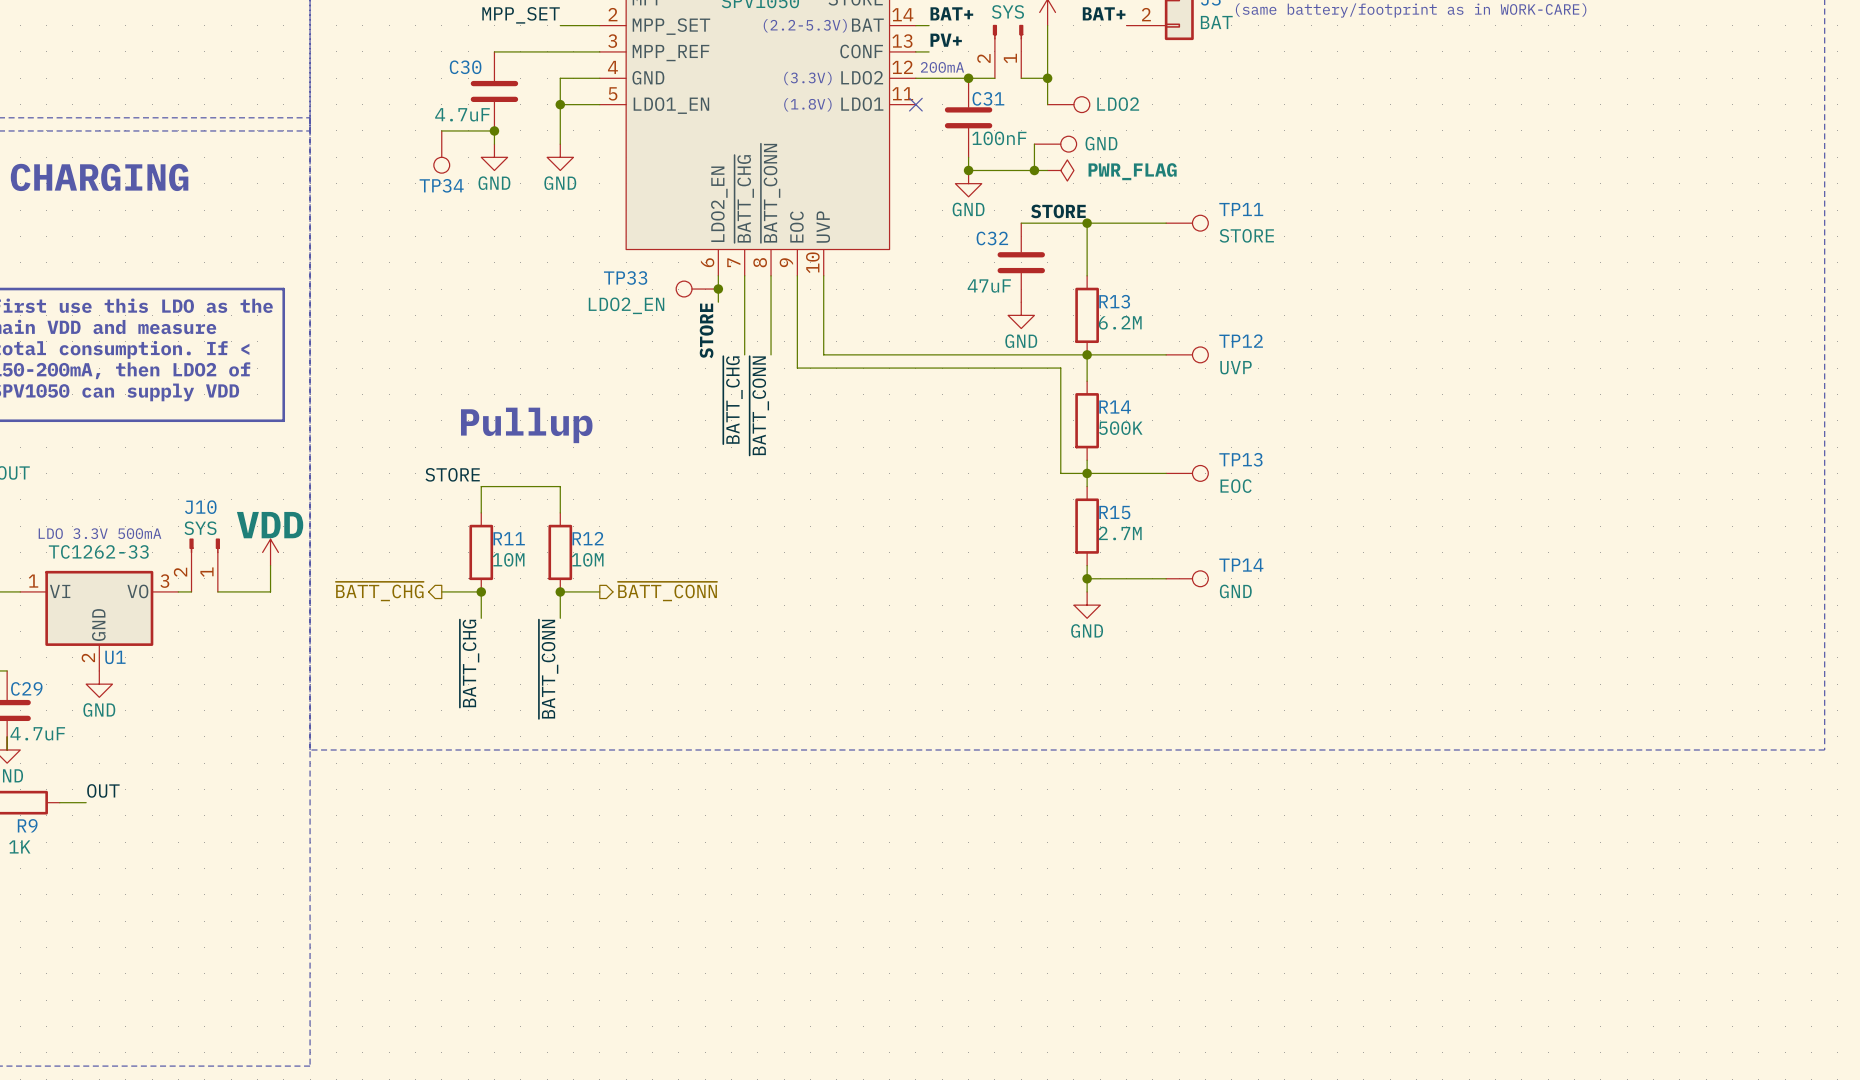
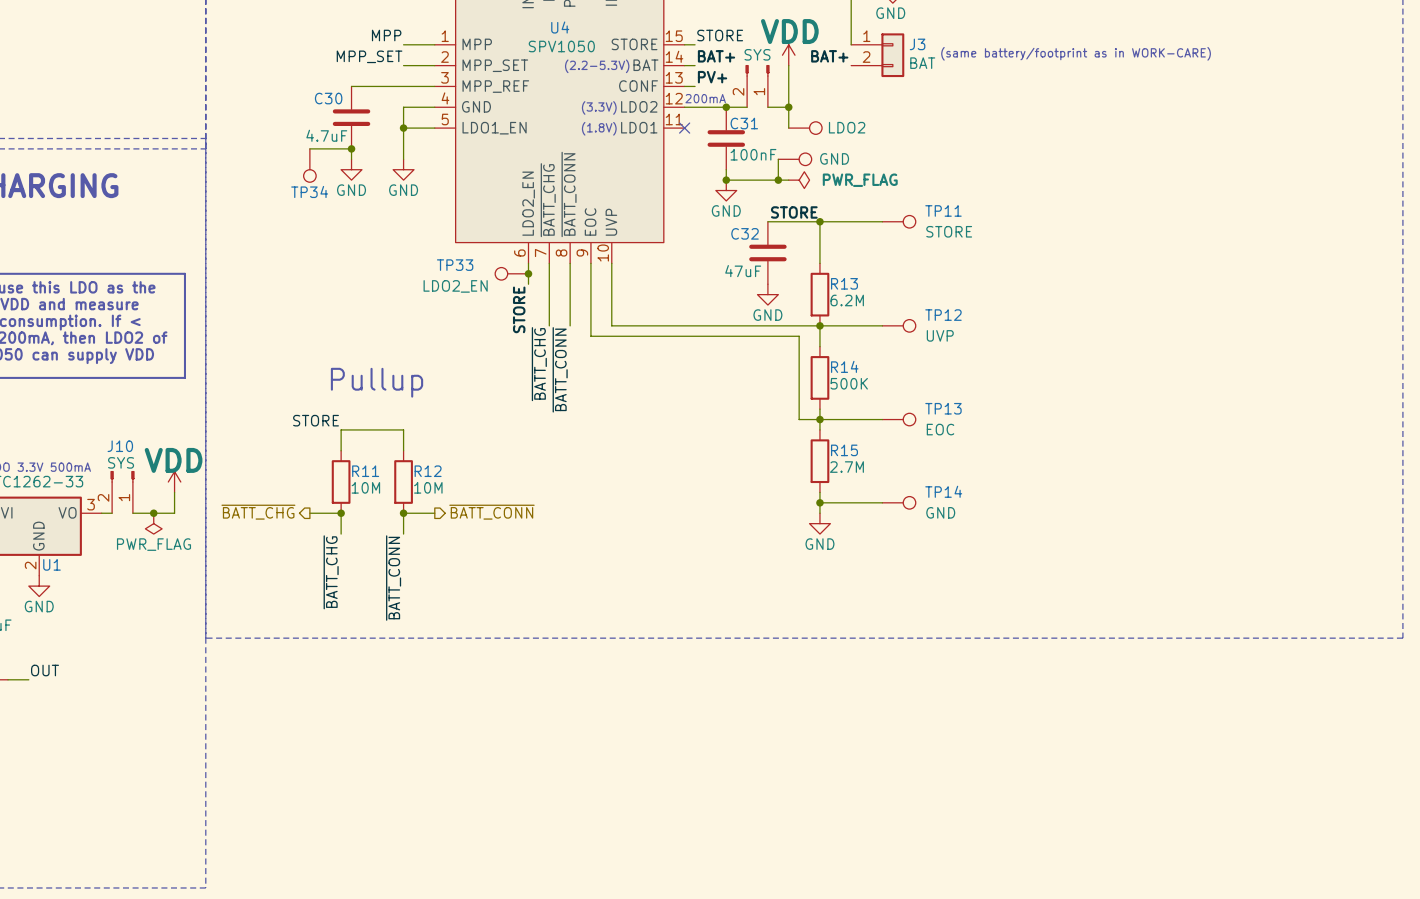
junction: none -> (153, 513)
power symbol: none -> PWR_FLAG (153, 523)

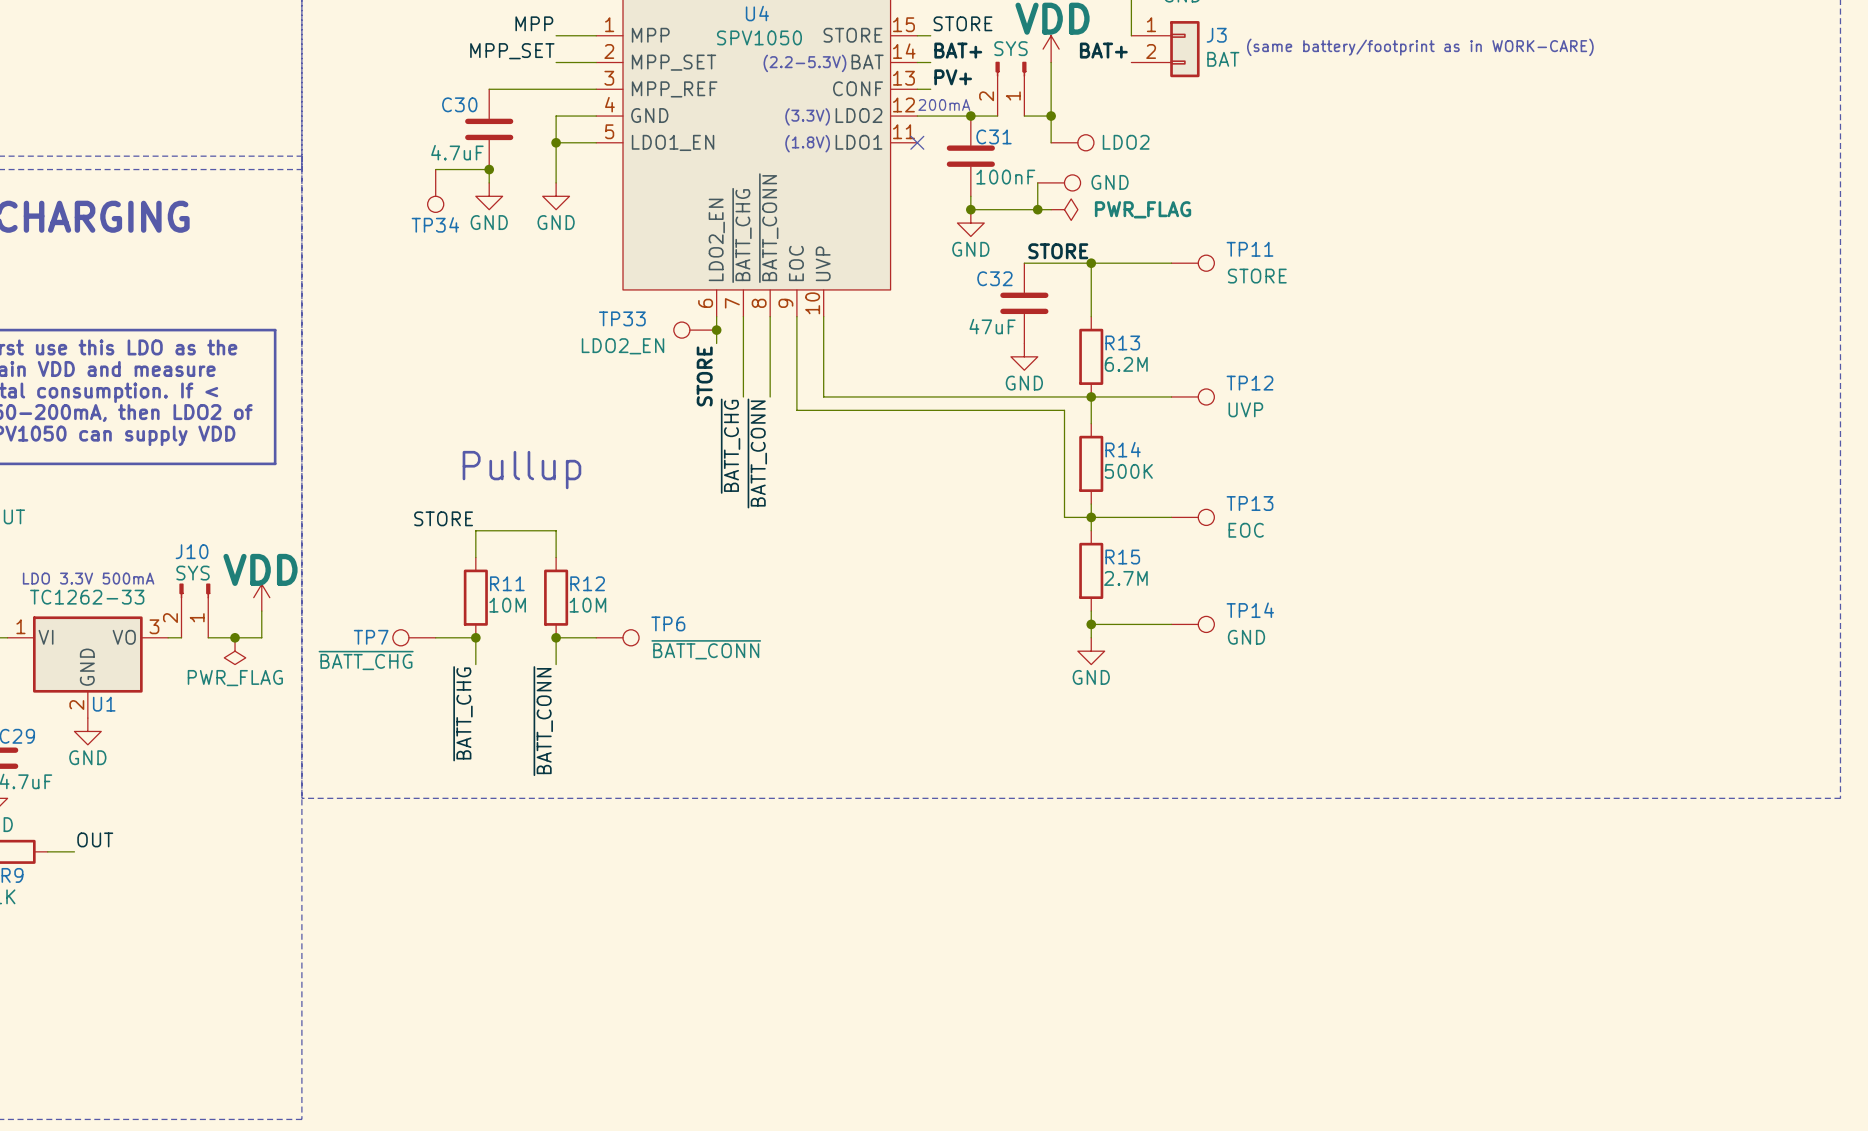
hierarchical label: ~{BATT_CHG} (258, 512) -> none
hierarchical label: ~{BATT_CONN} (491, 512) -> none
TP7: none -> ~{BATT_CHG} (414, 637)
TP6: none -> ~{BATT_CONN} (617, 637)

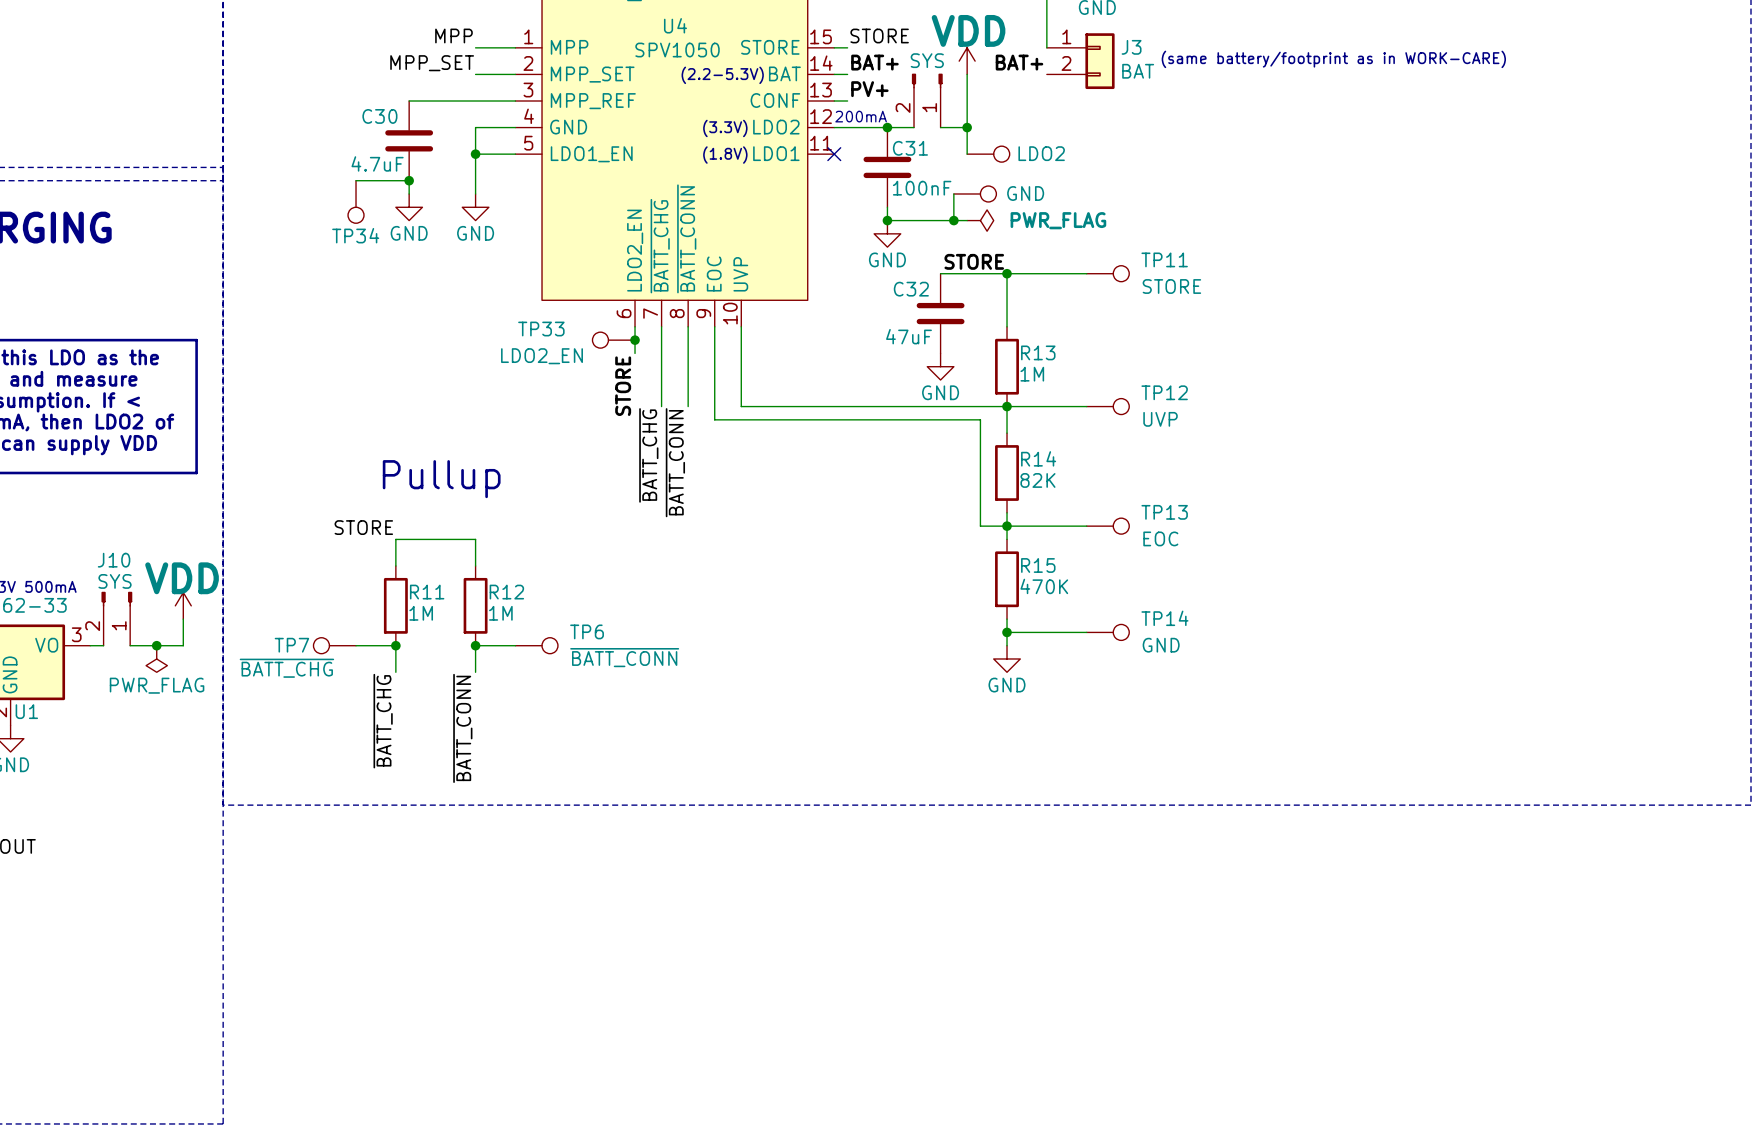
R13 value: 6.2M (1126, 364) -> 1M (1032, 374)
R14 value: 500K (1128, 471) -> 82K (1037, 480)
R15 value: 2.7M (1125, 578) -> 470K (1044, 586)
R11 value: 10M (507, 605) -> 1M (421, 613)
R12 value: 10M (587, 605) -> 1M (500, 613)

